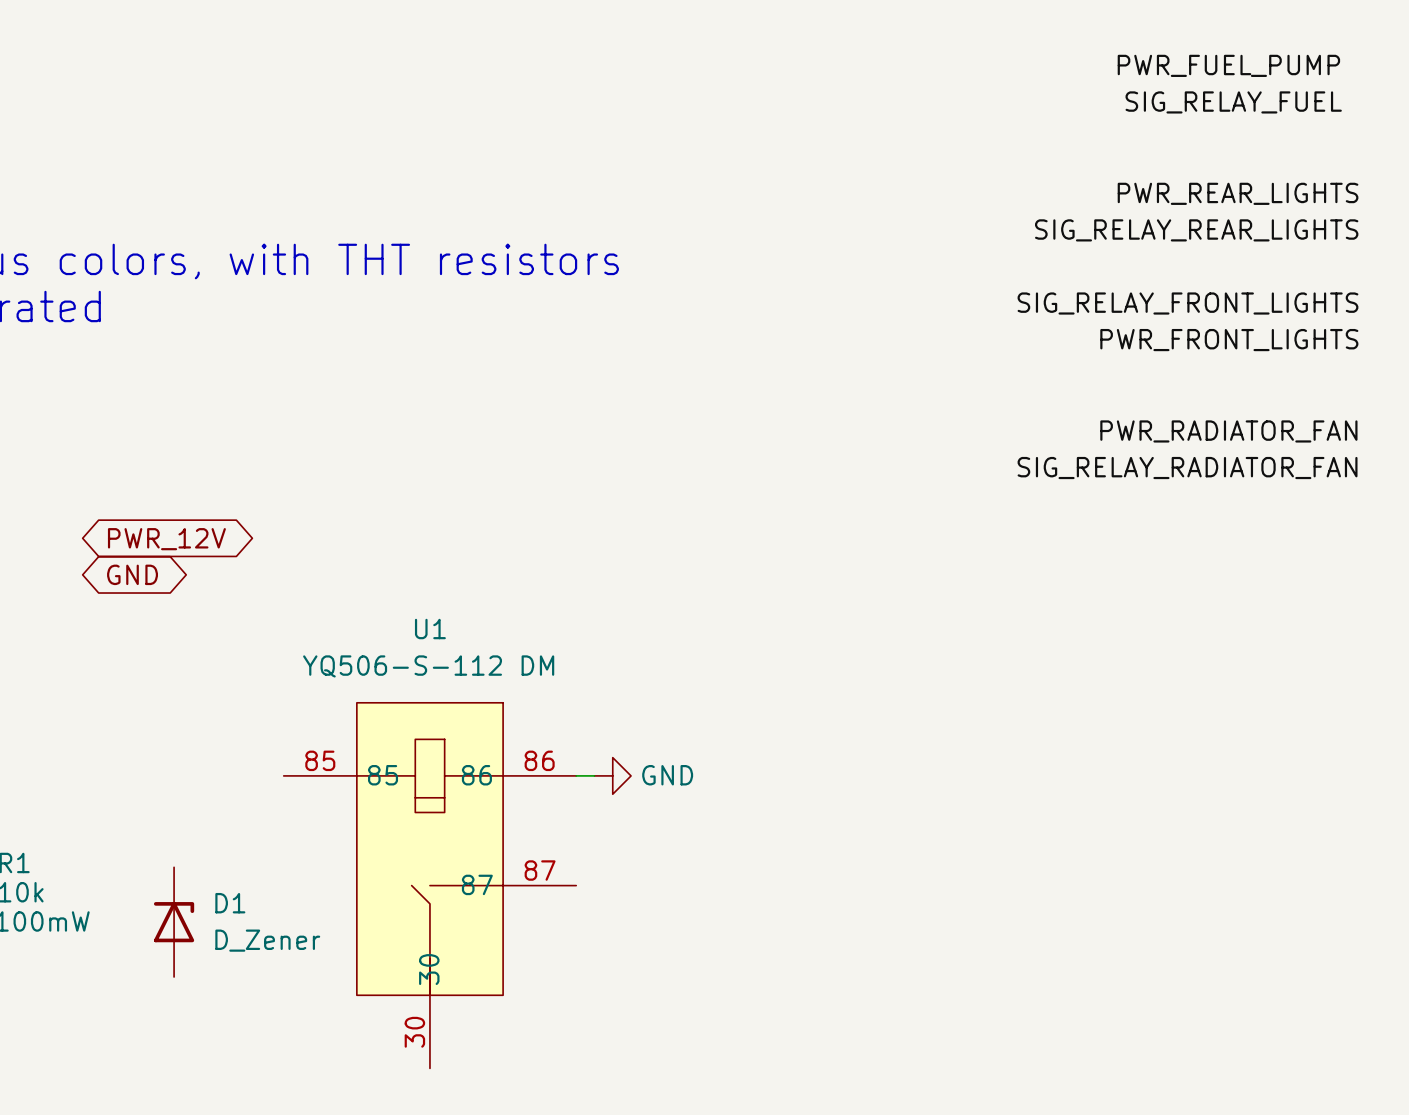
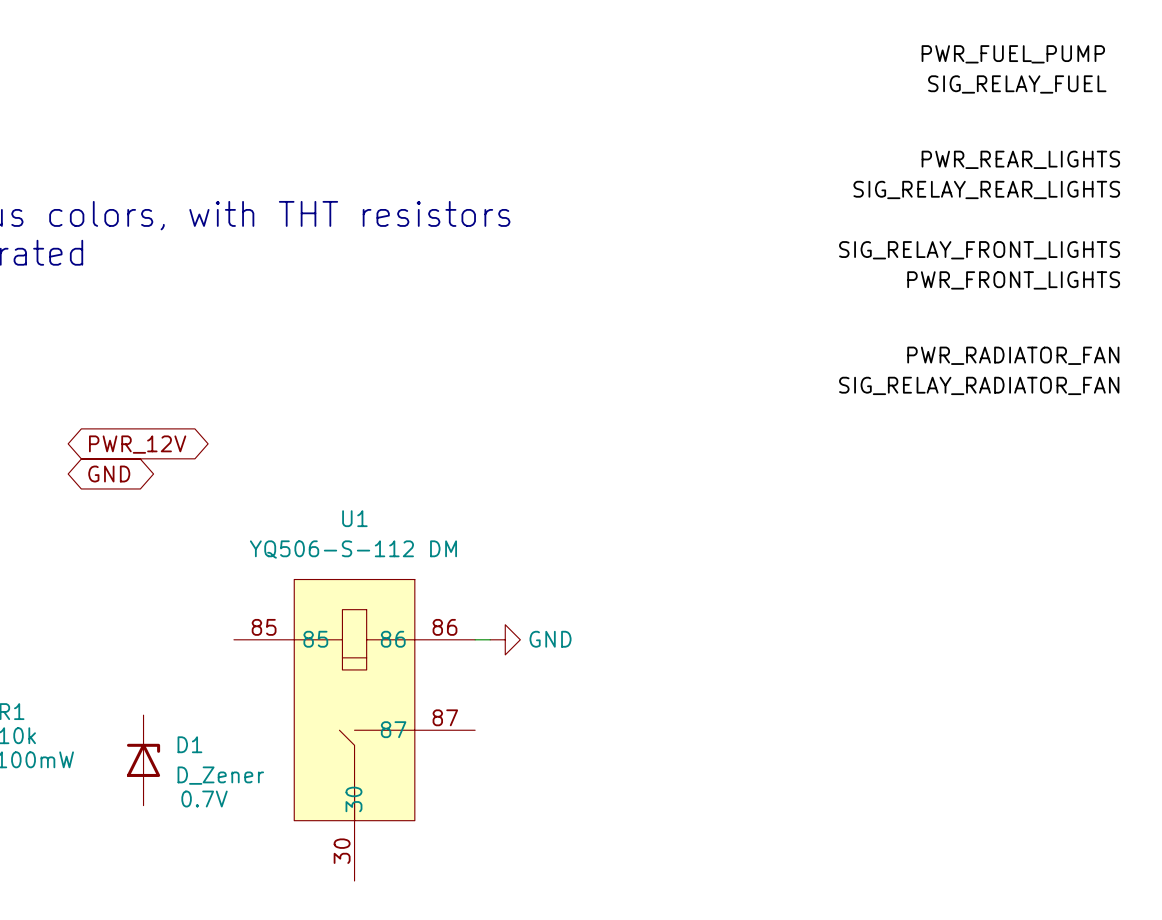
D1 text: none -> 0.7V (204, 799)

